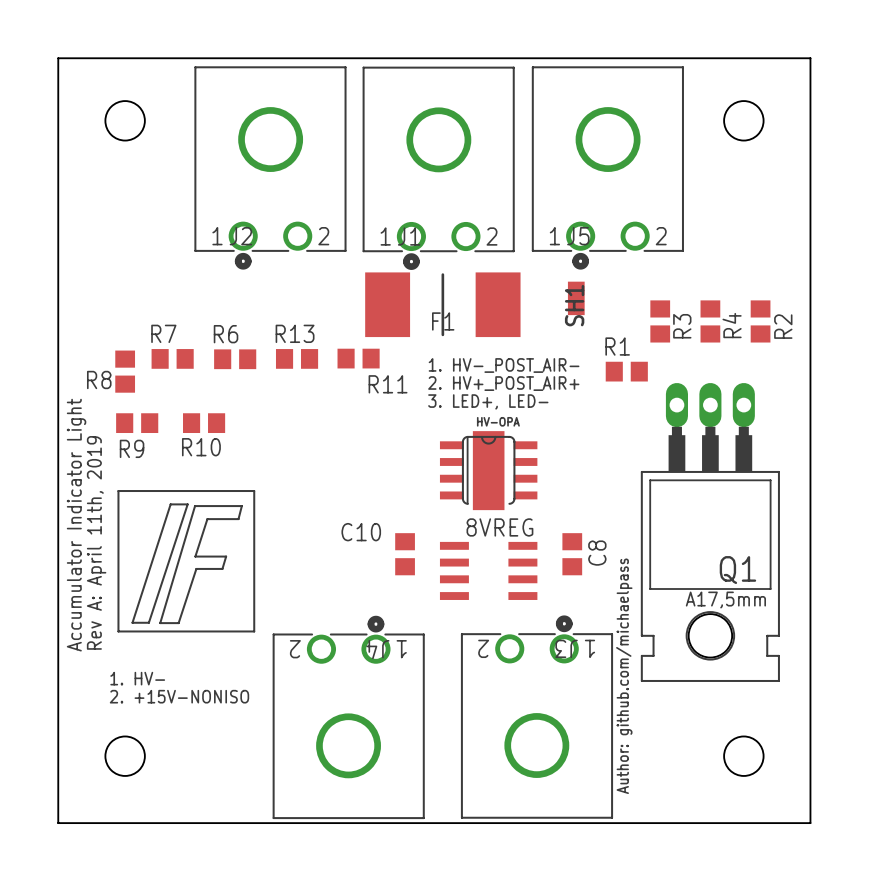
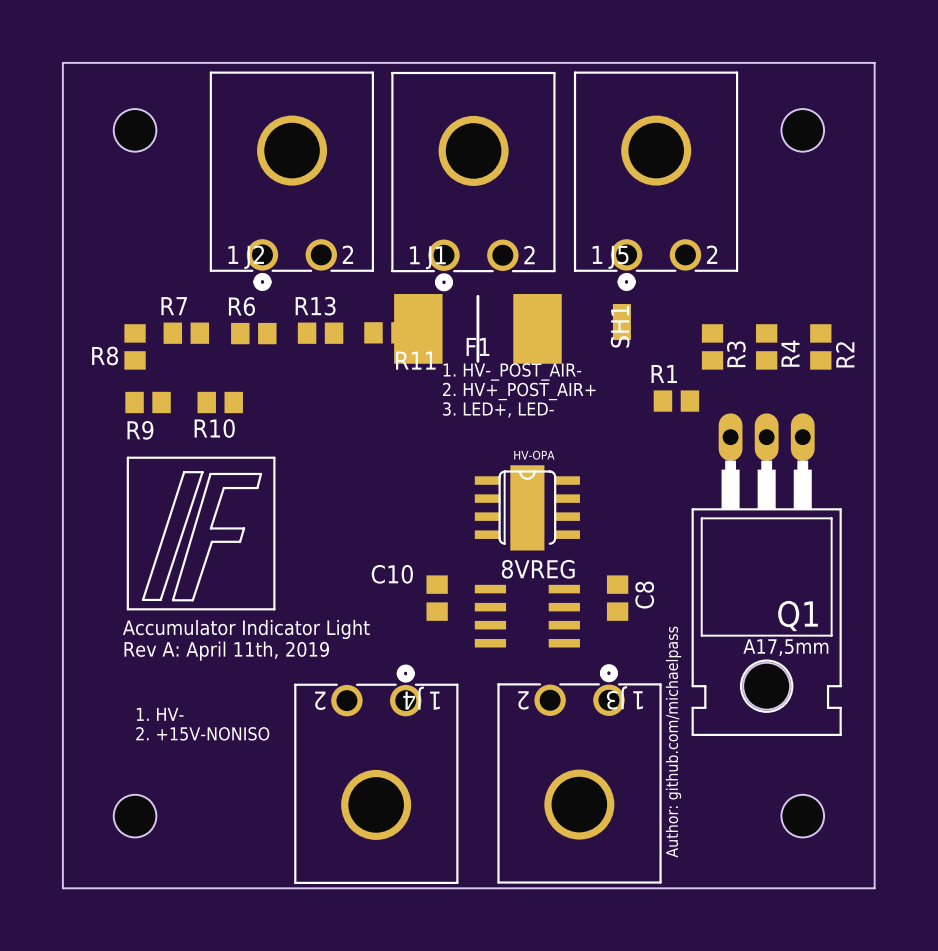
R7 position: (172, 358) -> (186, 333)
R13 position: (297, 358) -> (320, 333)
R11 position: (358, 358) -> (386, 332)
R6 position: (235, 359) -> (253, 333)
text position: 1. HV-_POST_AIR- (504, 365) -> 1. HV-_POST_AIR- (512, 372)
R8 position: (125, 371) -> (135, 346)
text position: 2. HV+_POST_AIR+ (503, 383) -> 2. HV+_POST_AIR+ (519, 391)
text position: 3. LED+, LED- (488, 401) -> 3. LED+, LED- (498, 409)
R9 position: (137, 423) -> (148, 402)
R10 position: (204, 423) -> (220, 402)
line: (118, 491) (254, 491) -> (127, 529) (127, 457) (274, 457) (274, 529)
line: (170, 504) (132, 622) (148, 622) (187, 504) (170, 504) -> (184, 472) (143, 599) (160, 599) (202, 472) (184, 472)
line: (195, 506) (160, 623) (178, 623) (196, 568) (222, 568) (226, 556) (195, 556) (207, 519) (238, 519) (241, 506) (195, 506) -> (210, 473) (172, 600) (192, 600) (211, 541) (240, 541) (244, 528) (210, 528) (223, 488) (257, 488) (261, 473) (210, 473)
text rotation: 0° (76, 525) -> 90° clockwise (246, 629)
text rotation: 0° (96, 542) -> 90° clockwise (226, 651)
line: (118, 564) (118, 631) (254, 631) (254, 564) -> (127, 609) (274, 609)
text position: 1. HV- (137, 678) -> 1. HV- (160, 714)
text position: 2. +15V-NONISO (179, 696) -> 2. +15V-NONISO (202, 733)

